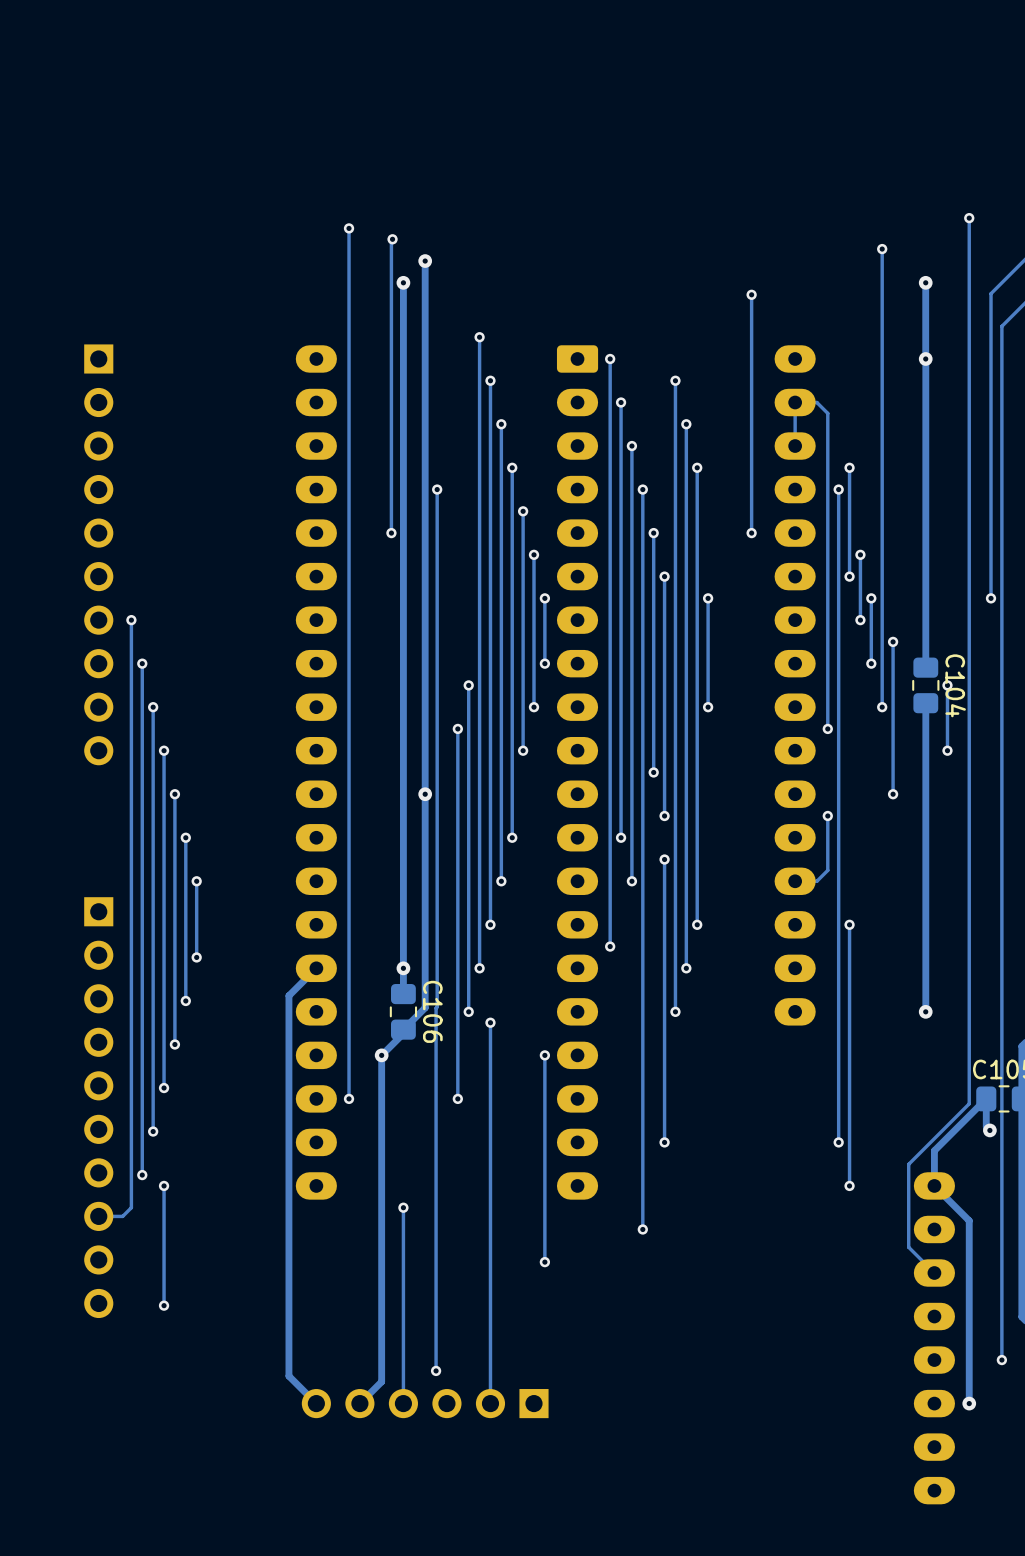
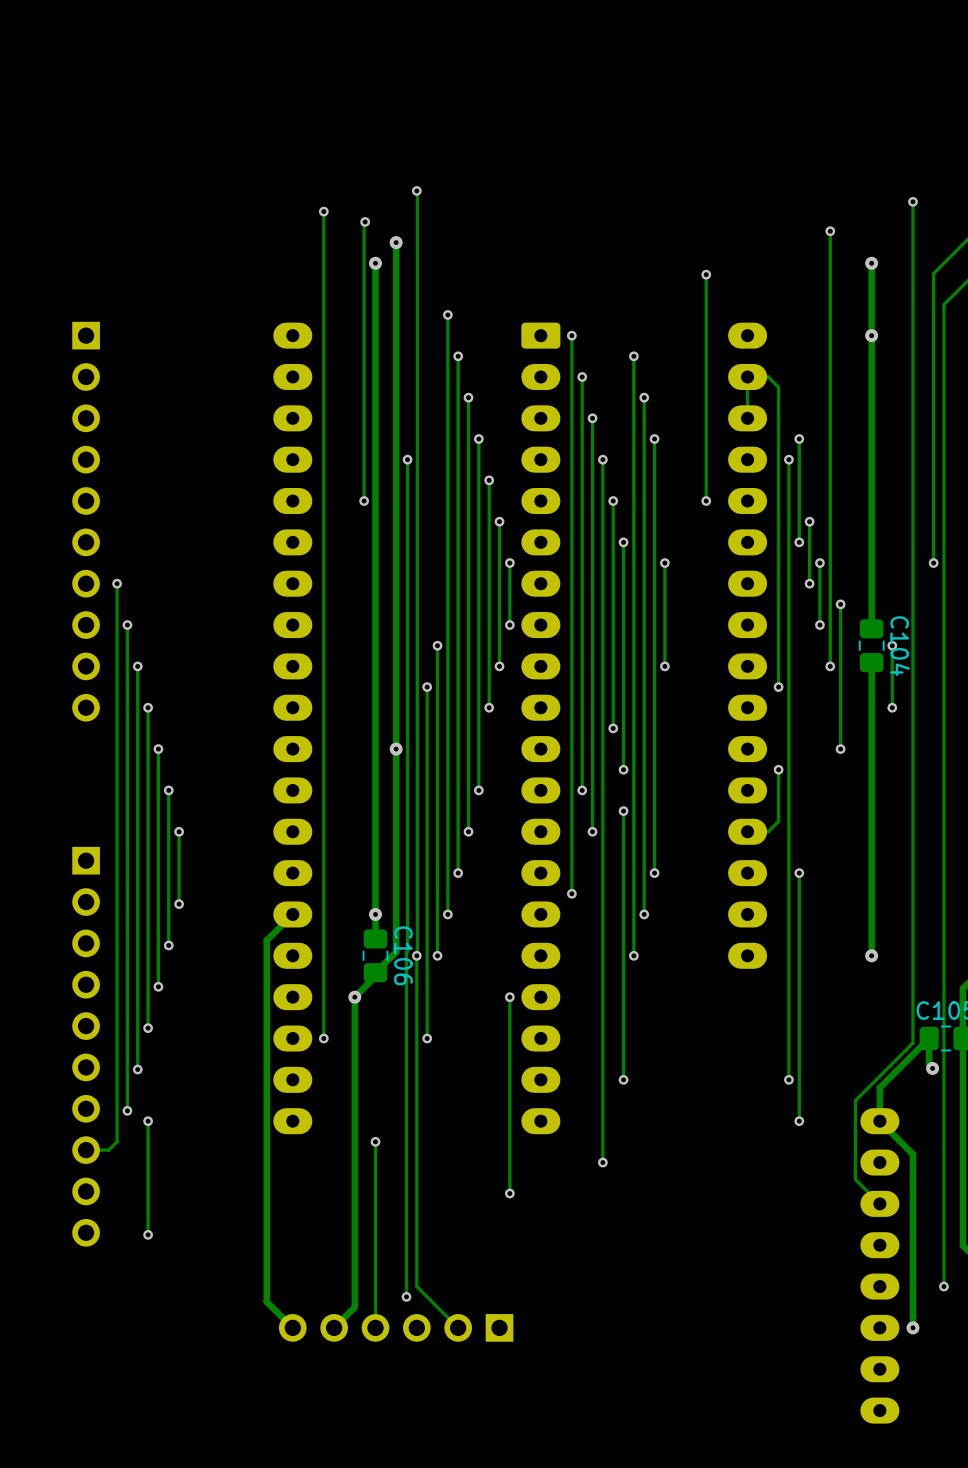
via: none -> (416, 190)
track: (490, 1022) (490, 1403) -> (416, 190) (416, 1286) (458, 1327)
via position: (490, 1022) -> (416, 955)

